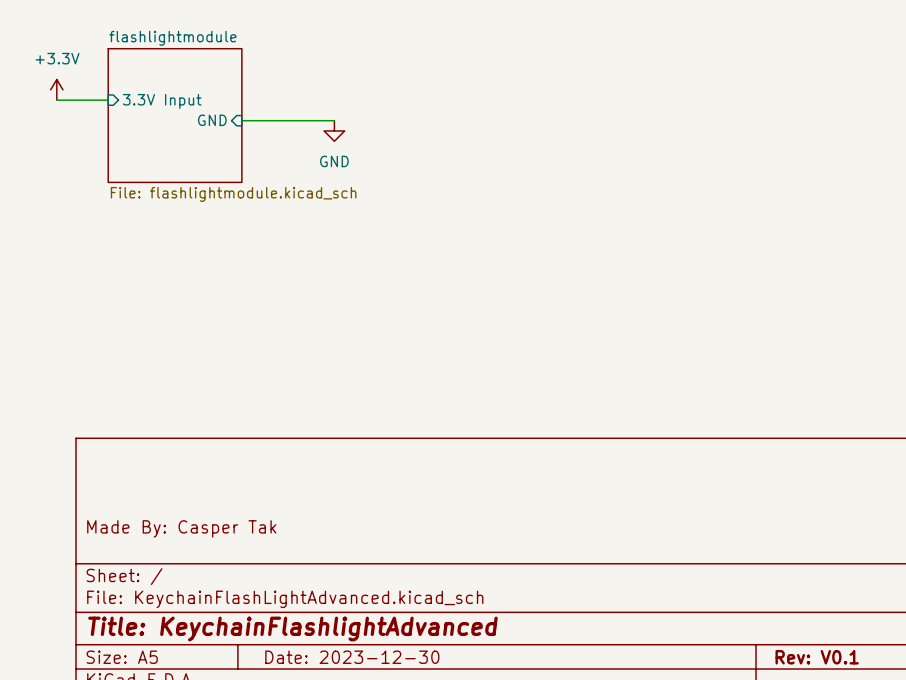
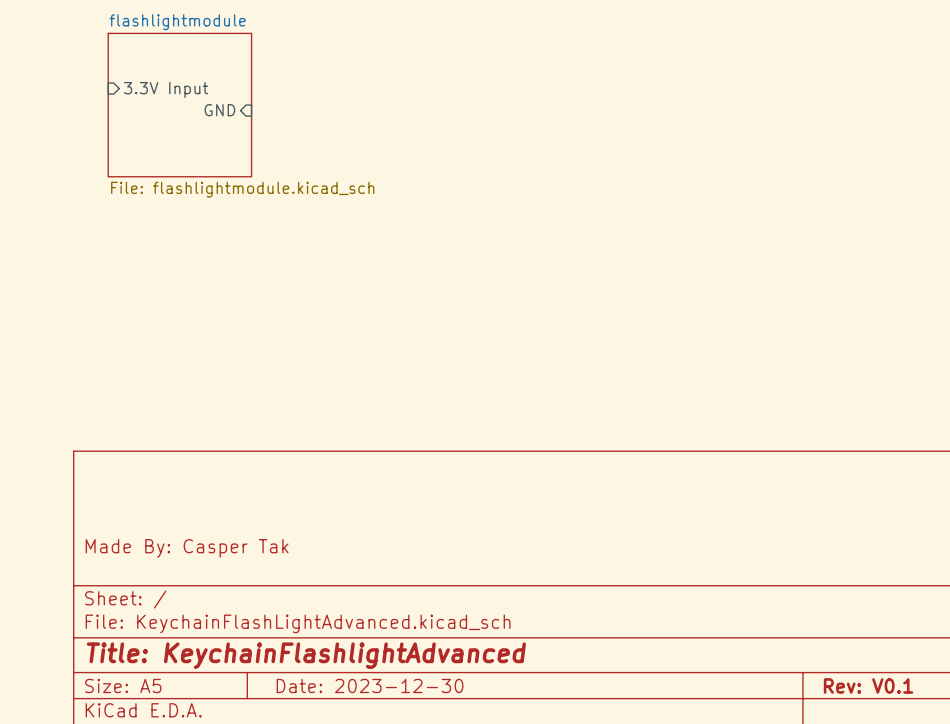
power symbol: +3.3V (56, 89) -> none
wire: (56, 100) (108, 100) -> none
wire: (241, 120) (334, 120) -> none
power symbol: GND (334, 130) -> none

